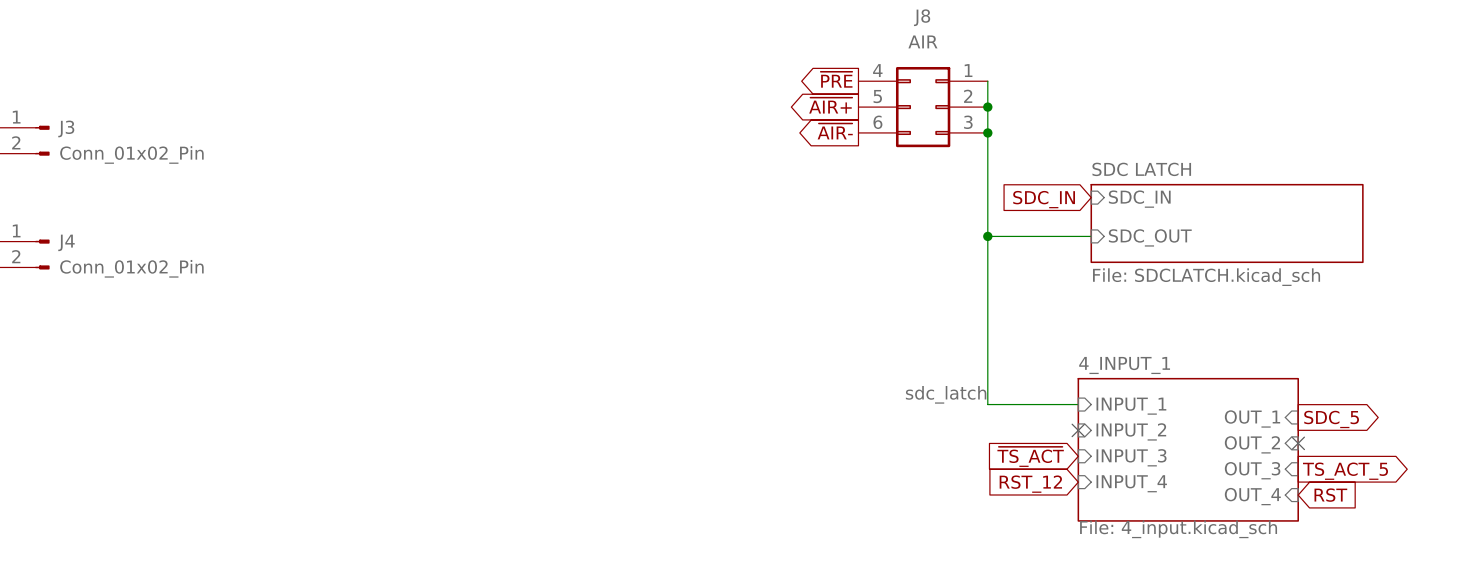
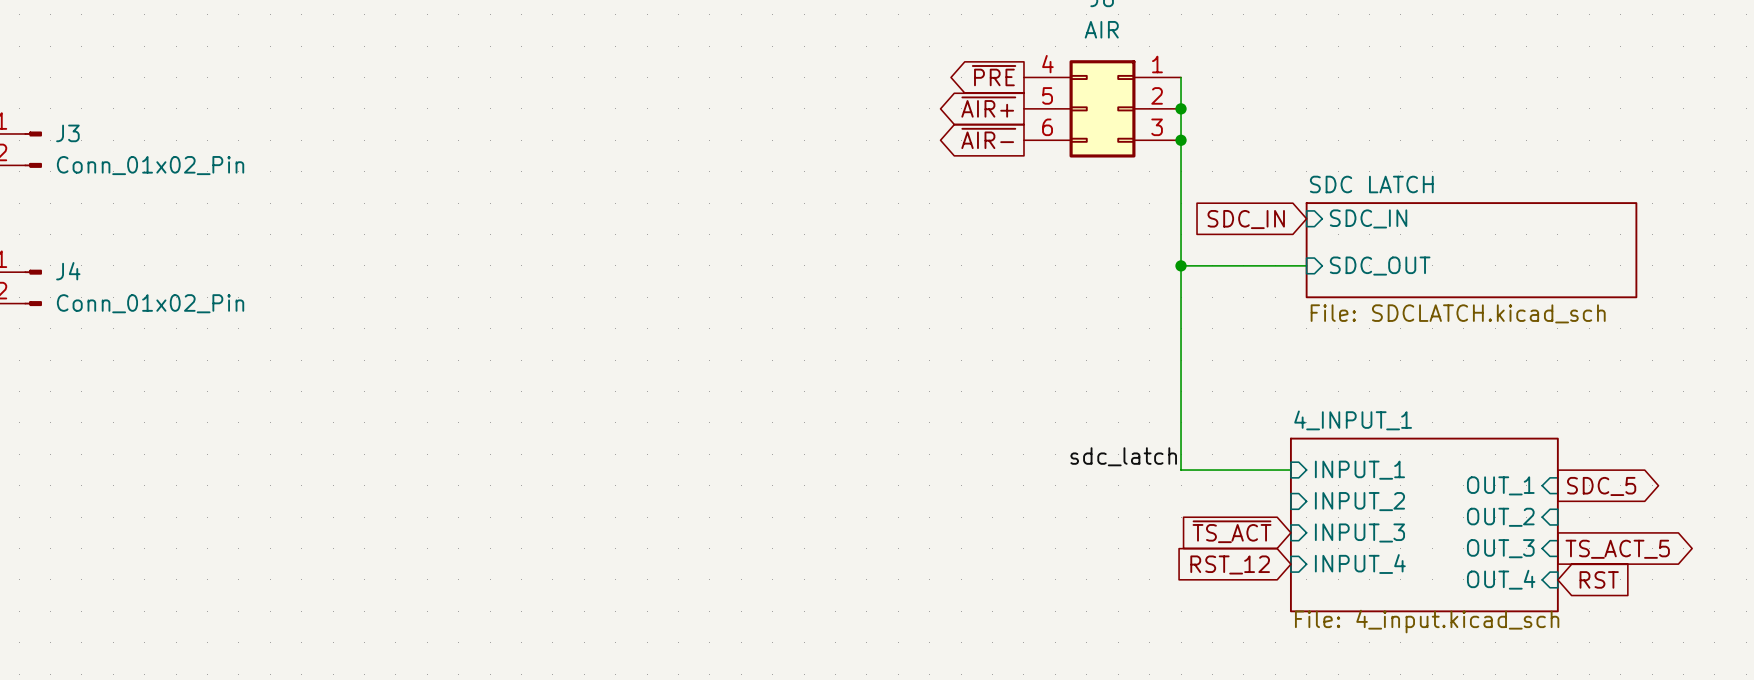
no-connect mark: (1078, 430) -> none
no-connect mark: (1298, 443) -> none

